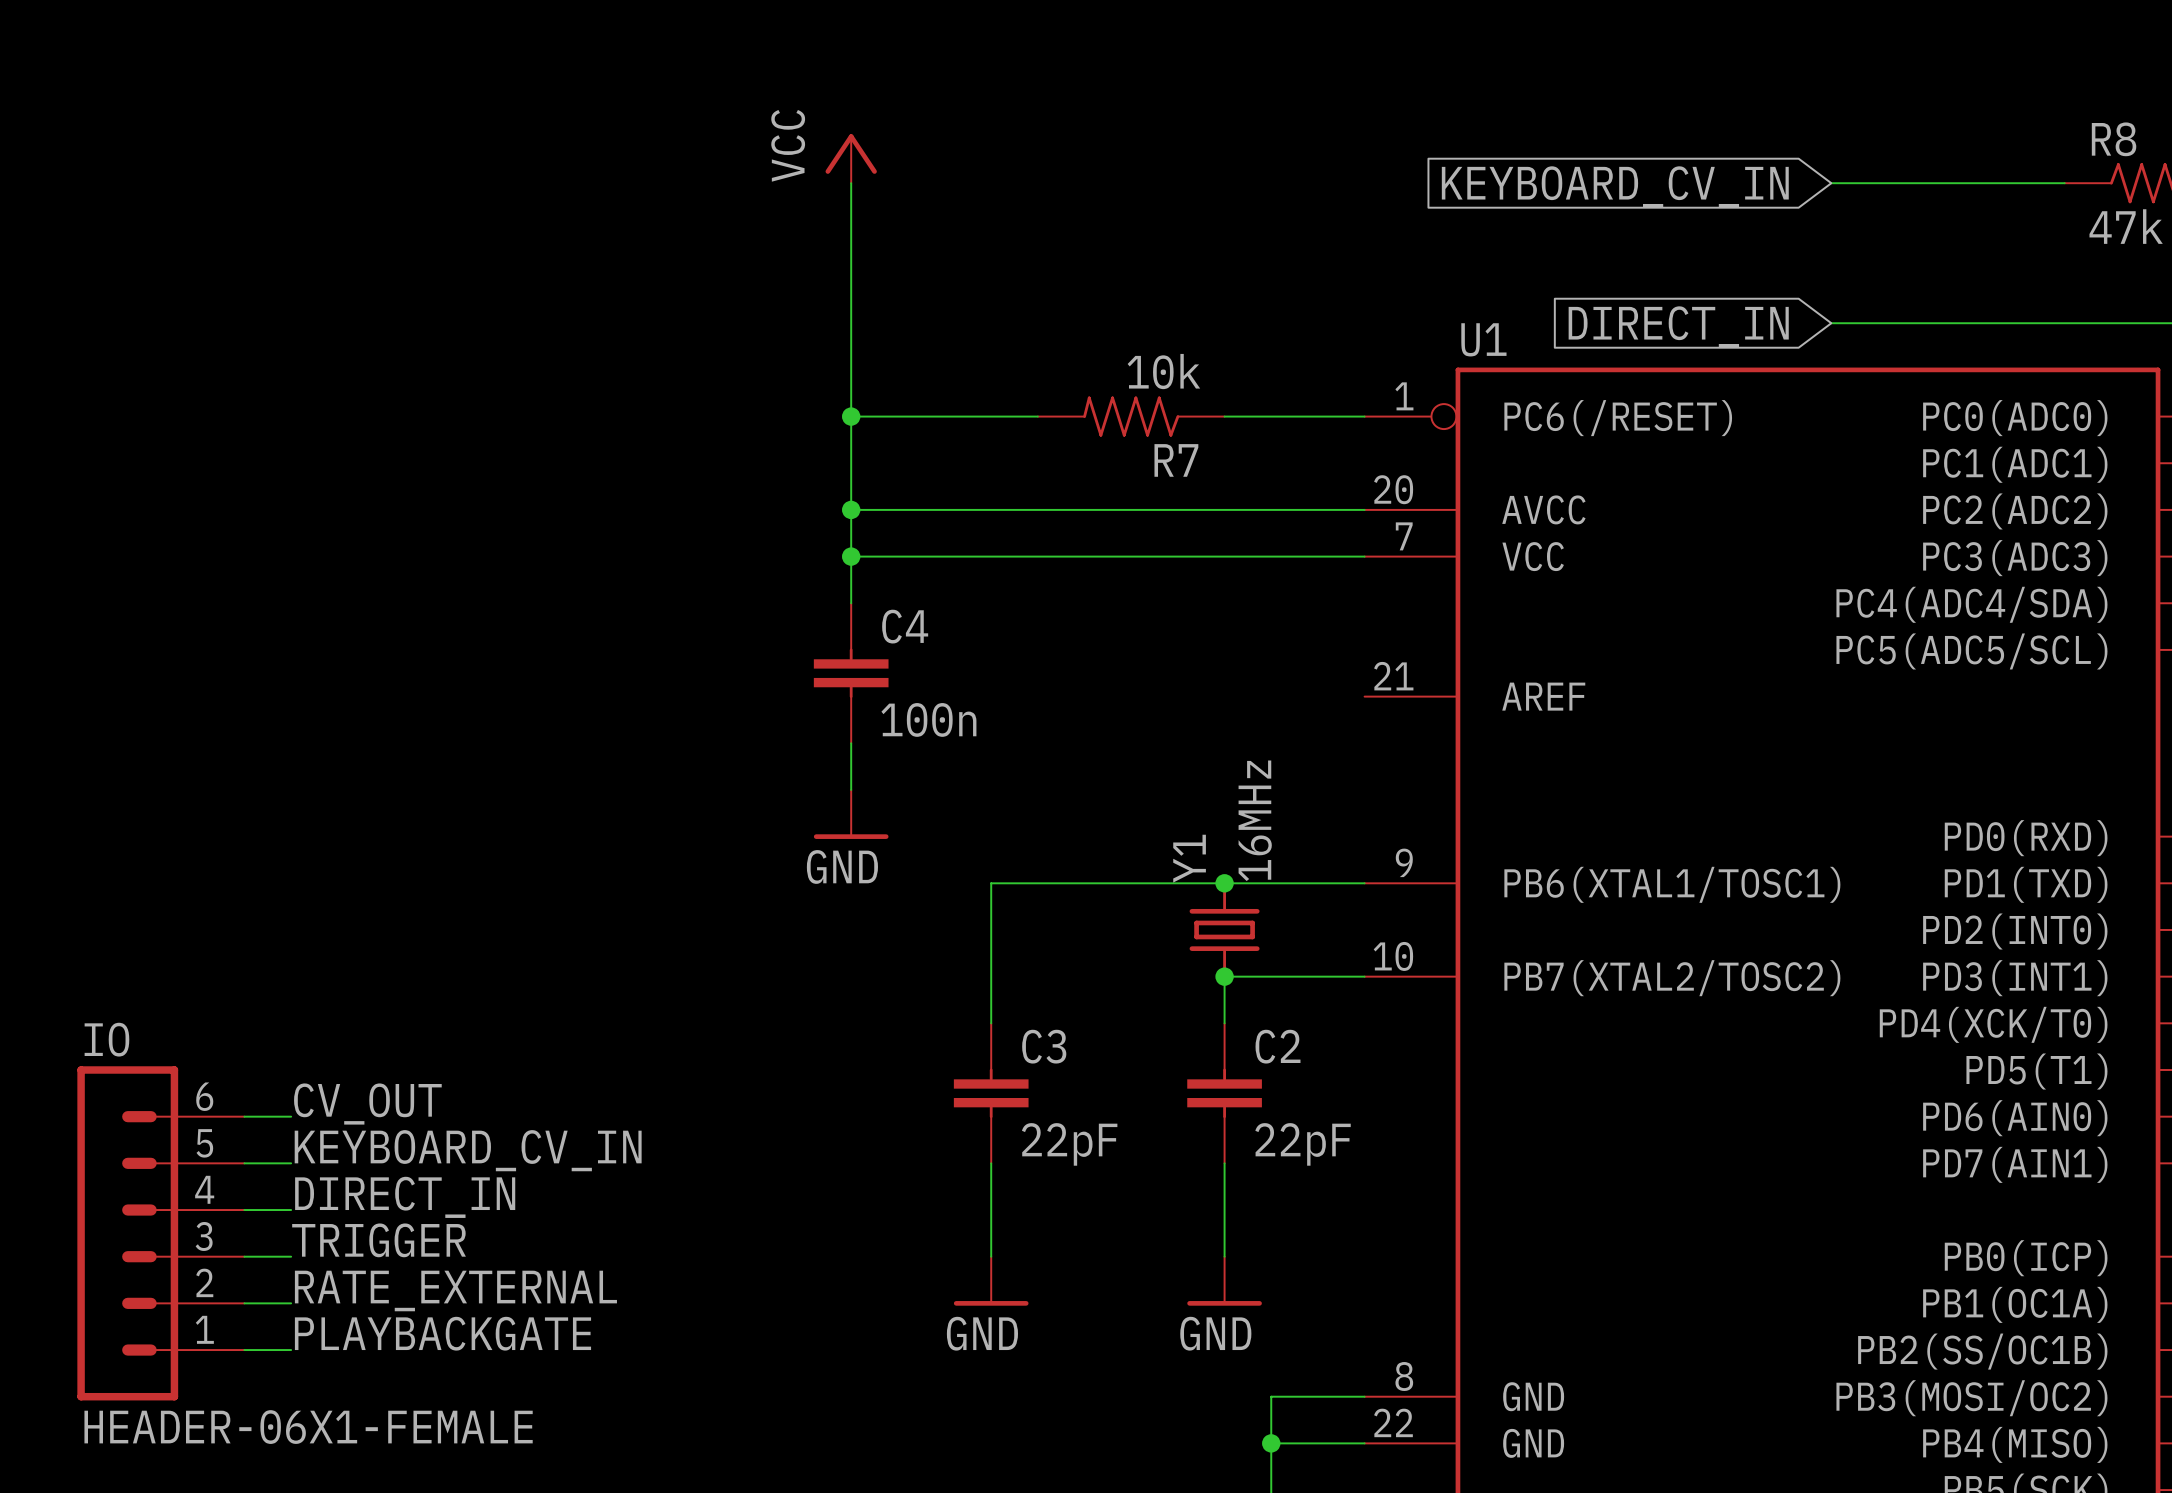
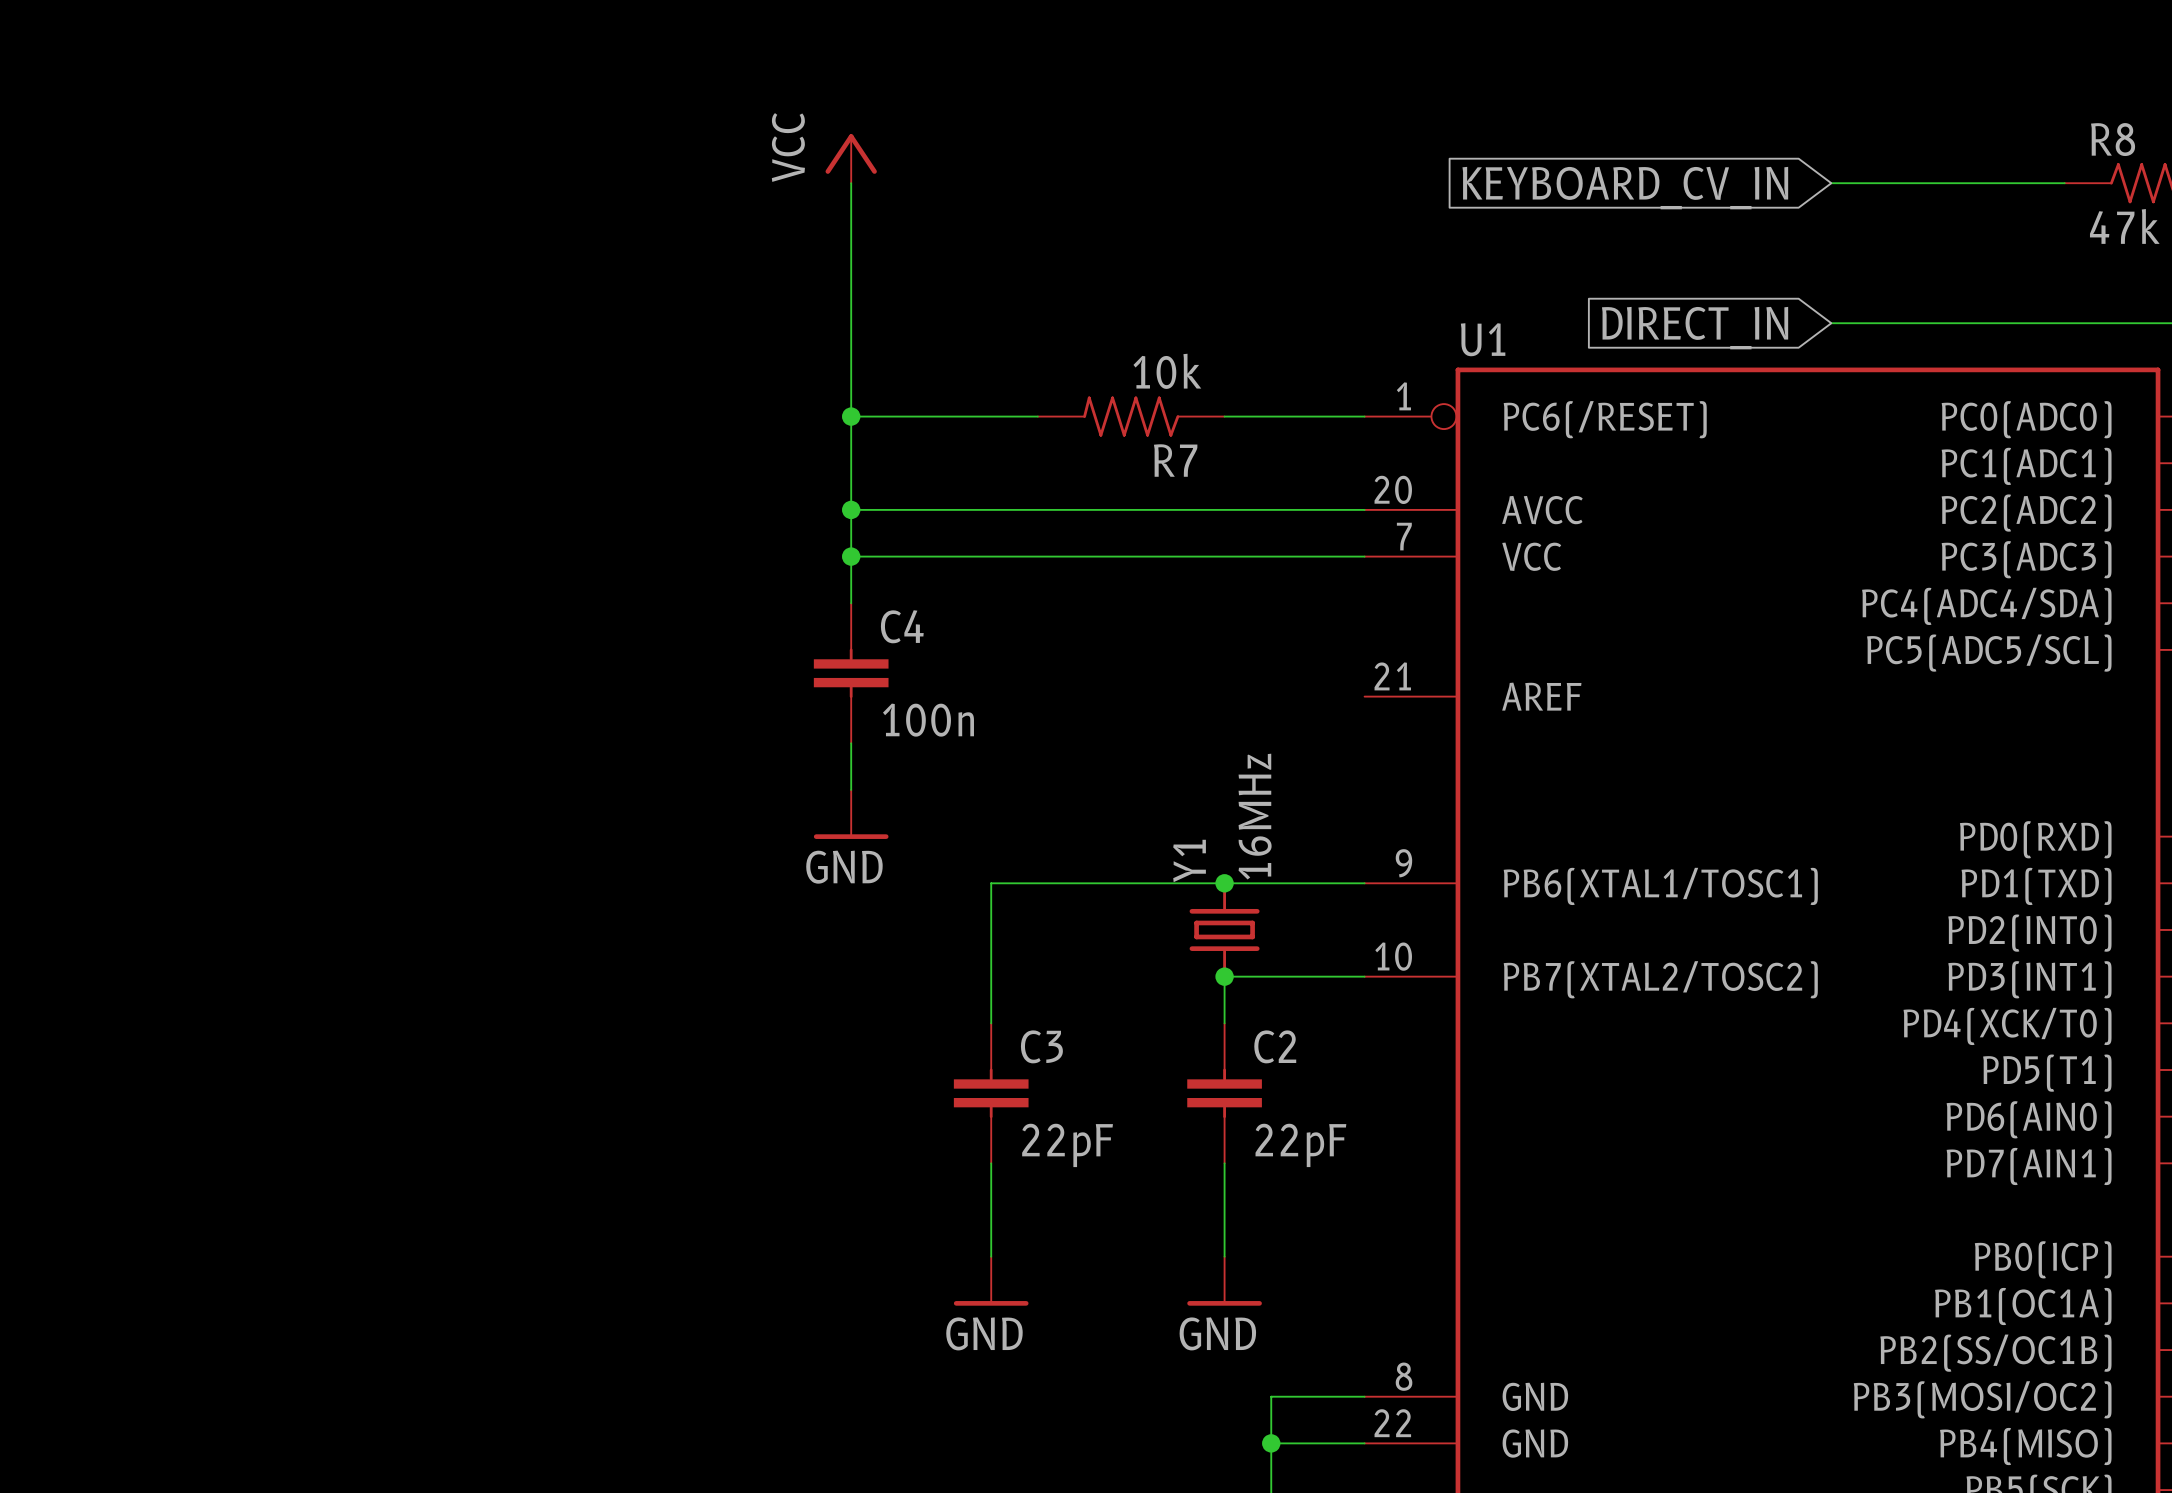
label: CV_OUT (367, 1104) -> none
wire: (244, 1116) (291, 1116) -> none
label: KEYBOARD_CV_IN (468, 1150) -> none
wire: (244, 1163) (291, 1163) -> none
label: DIRECT_IN (405, 1197) -> none
wire: (244, 1210) (291, 1210) -> none
IO: HEADER-06X1-FEMALE (160, 1233) -> none
label: TRIGGER (379, 1240) -> none
wire: (244, 1256) (291, 1256) -> none
label: RATE_EXTERNAL (455, 1290) -> none
wire: (244, 1303) (291, 1303) -> none
label: PLAYBACKGATE (442, 1333) -> none
wire: (244, 1350) (291, 1350) -> none

